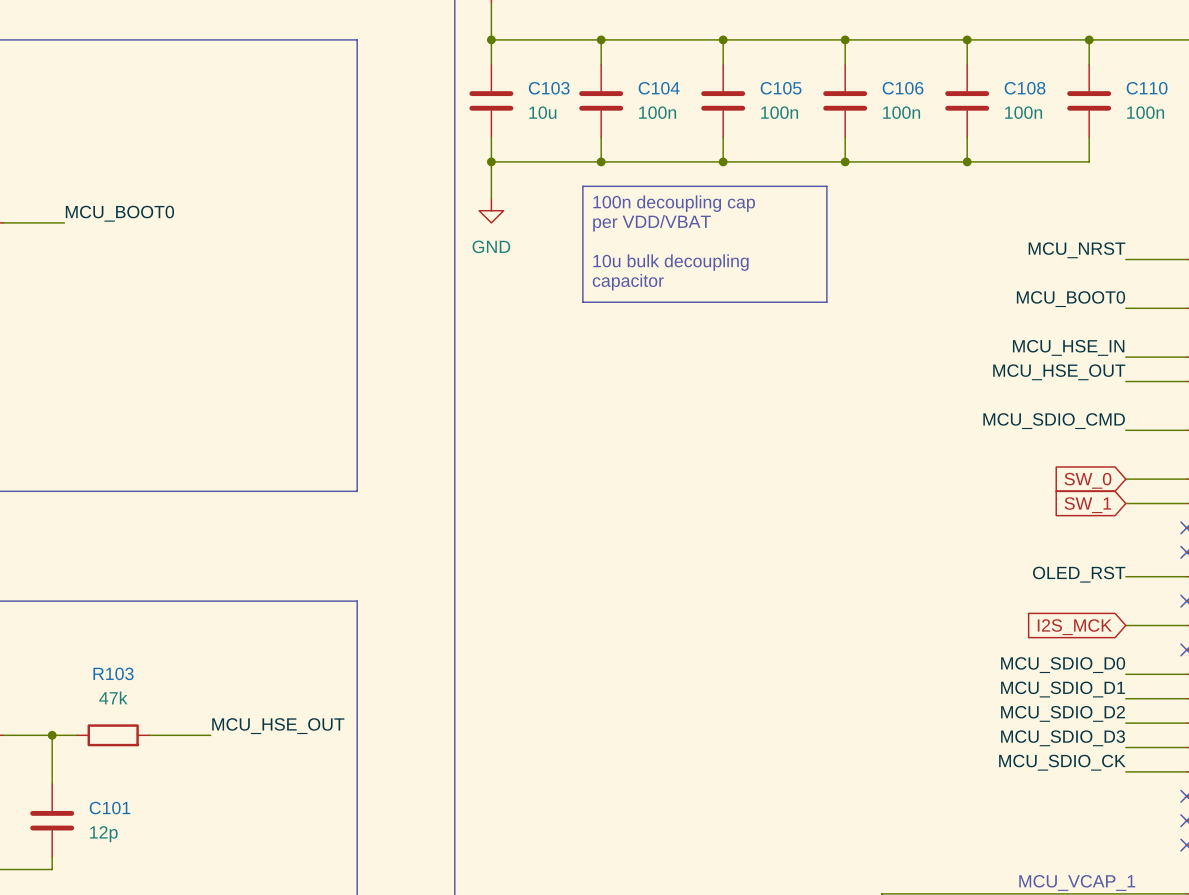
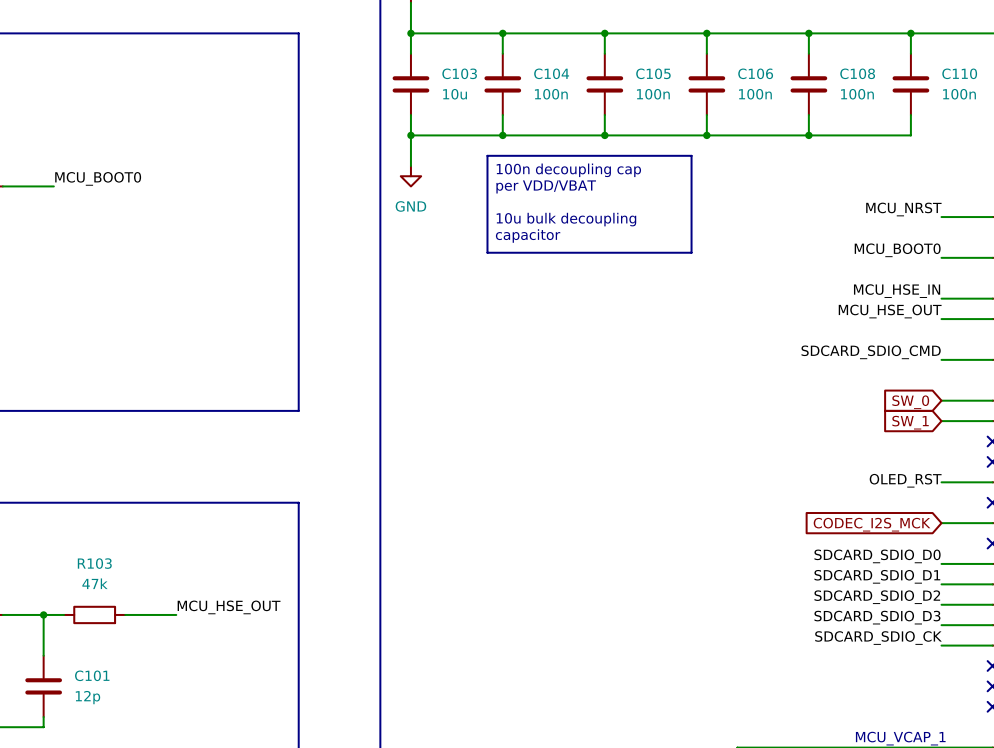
label: MCU_SDIO_CMD (1054, 421) -> SDCARD_SDIO_CMD (871, 352)
global label: I2S_MCK (1074, 627) -> CODEC_I2S_MCK (872, 524)
label: MCU_SDIO_D0 (1063, 665) -> SDCARD_SDIO_D0 (877, 556)
label: MCU_SDIO_D1 (1063, 689) -> SDCARD_SDIO_D1 (877, 576)
label: MCU_SDIO_D2 (1063, 713) -> SDCARD_SDIO_D2 (877, 597)
label: MCU_SDIO_D3 (1063, 738) -> SDCARD_SDIO_D3 (877, 617)
label: MCU_SDIO_CK (1062, 762) -> SDCARD_SDIO_CK (878, 638)

